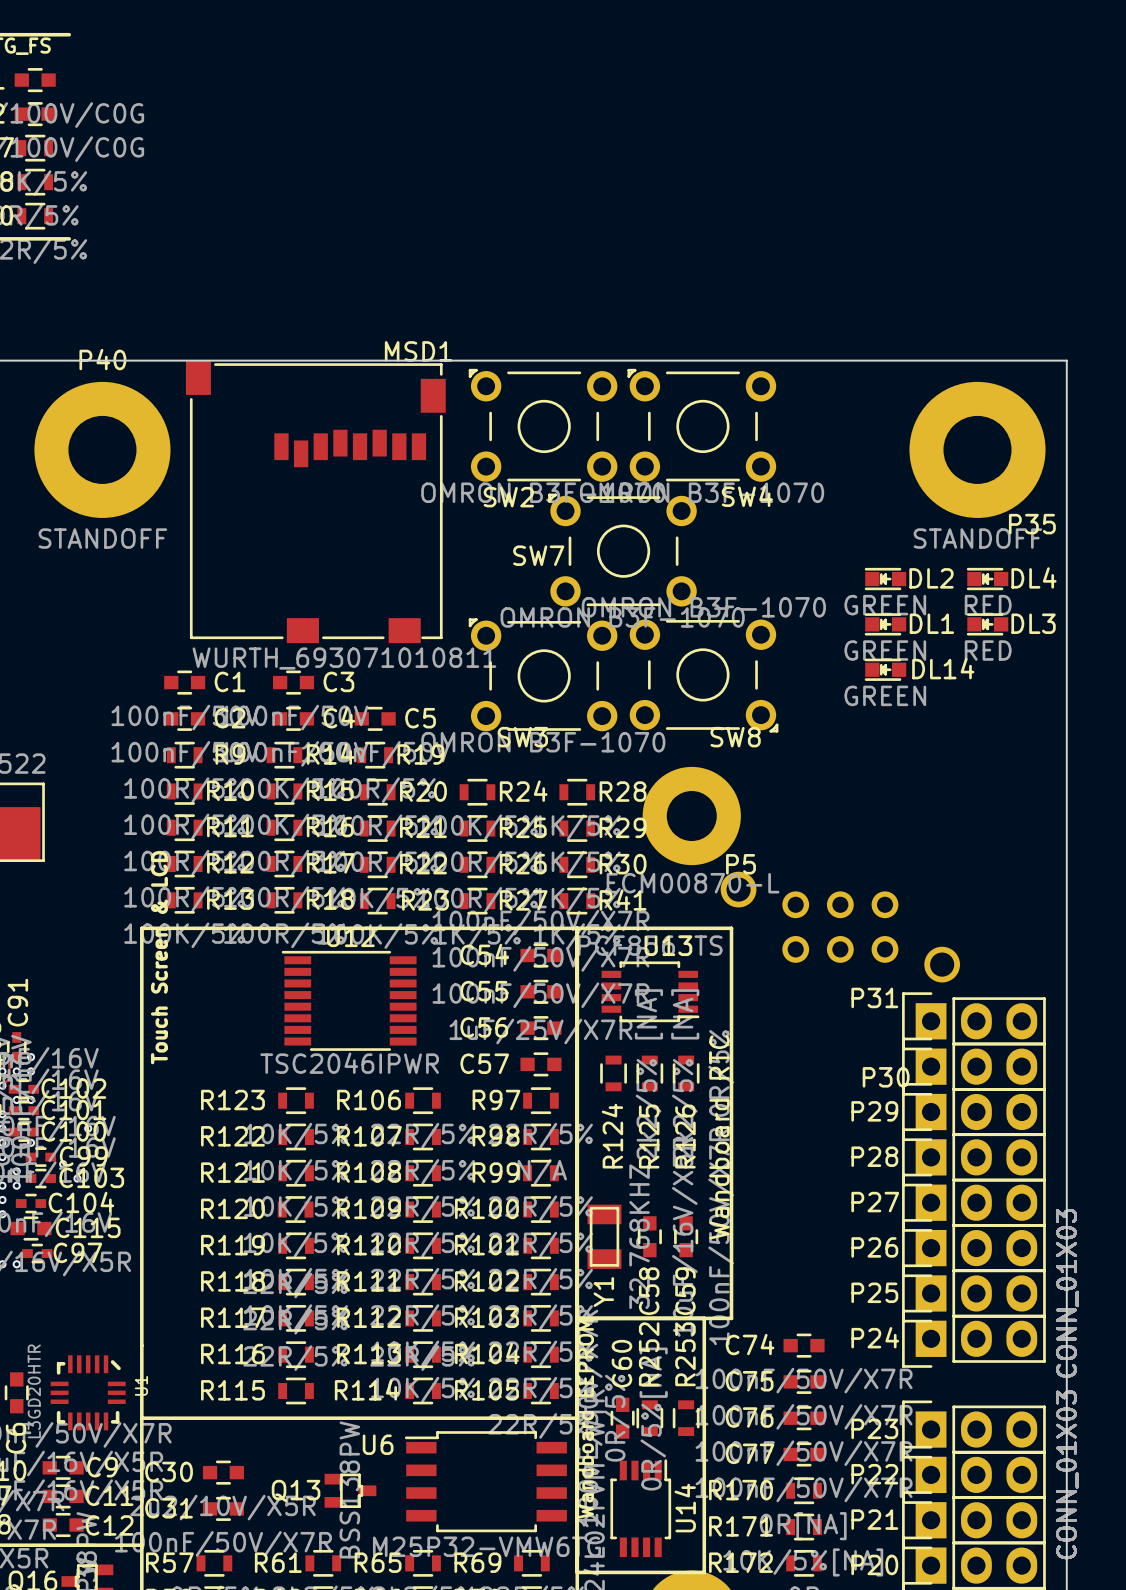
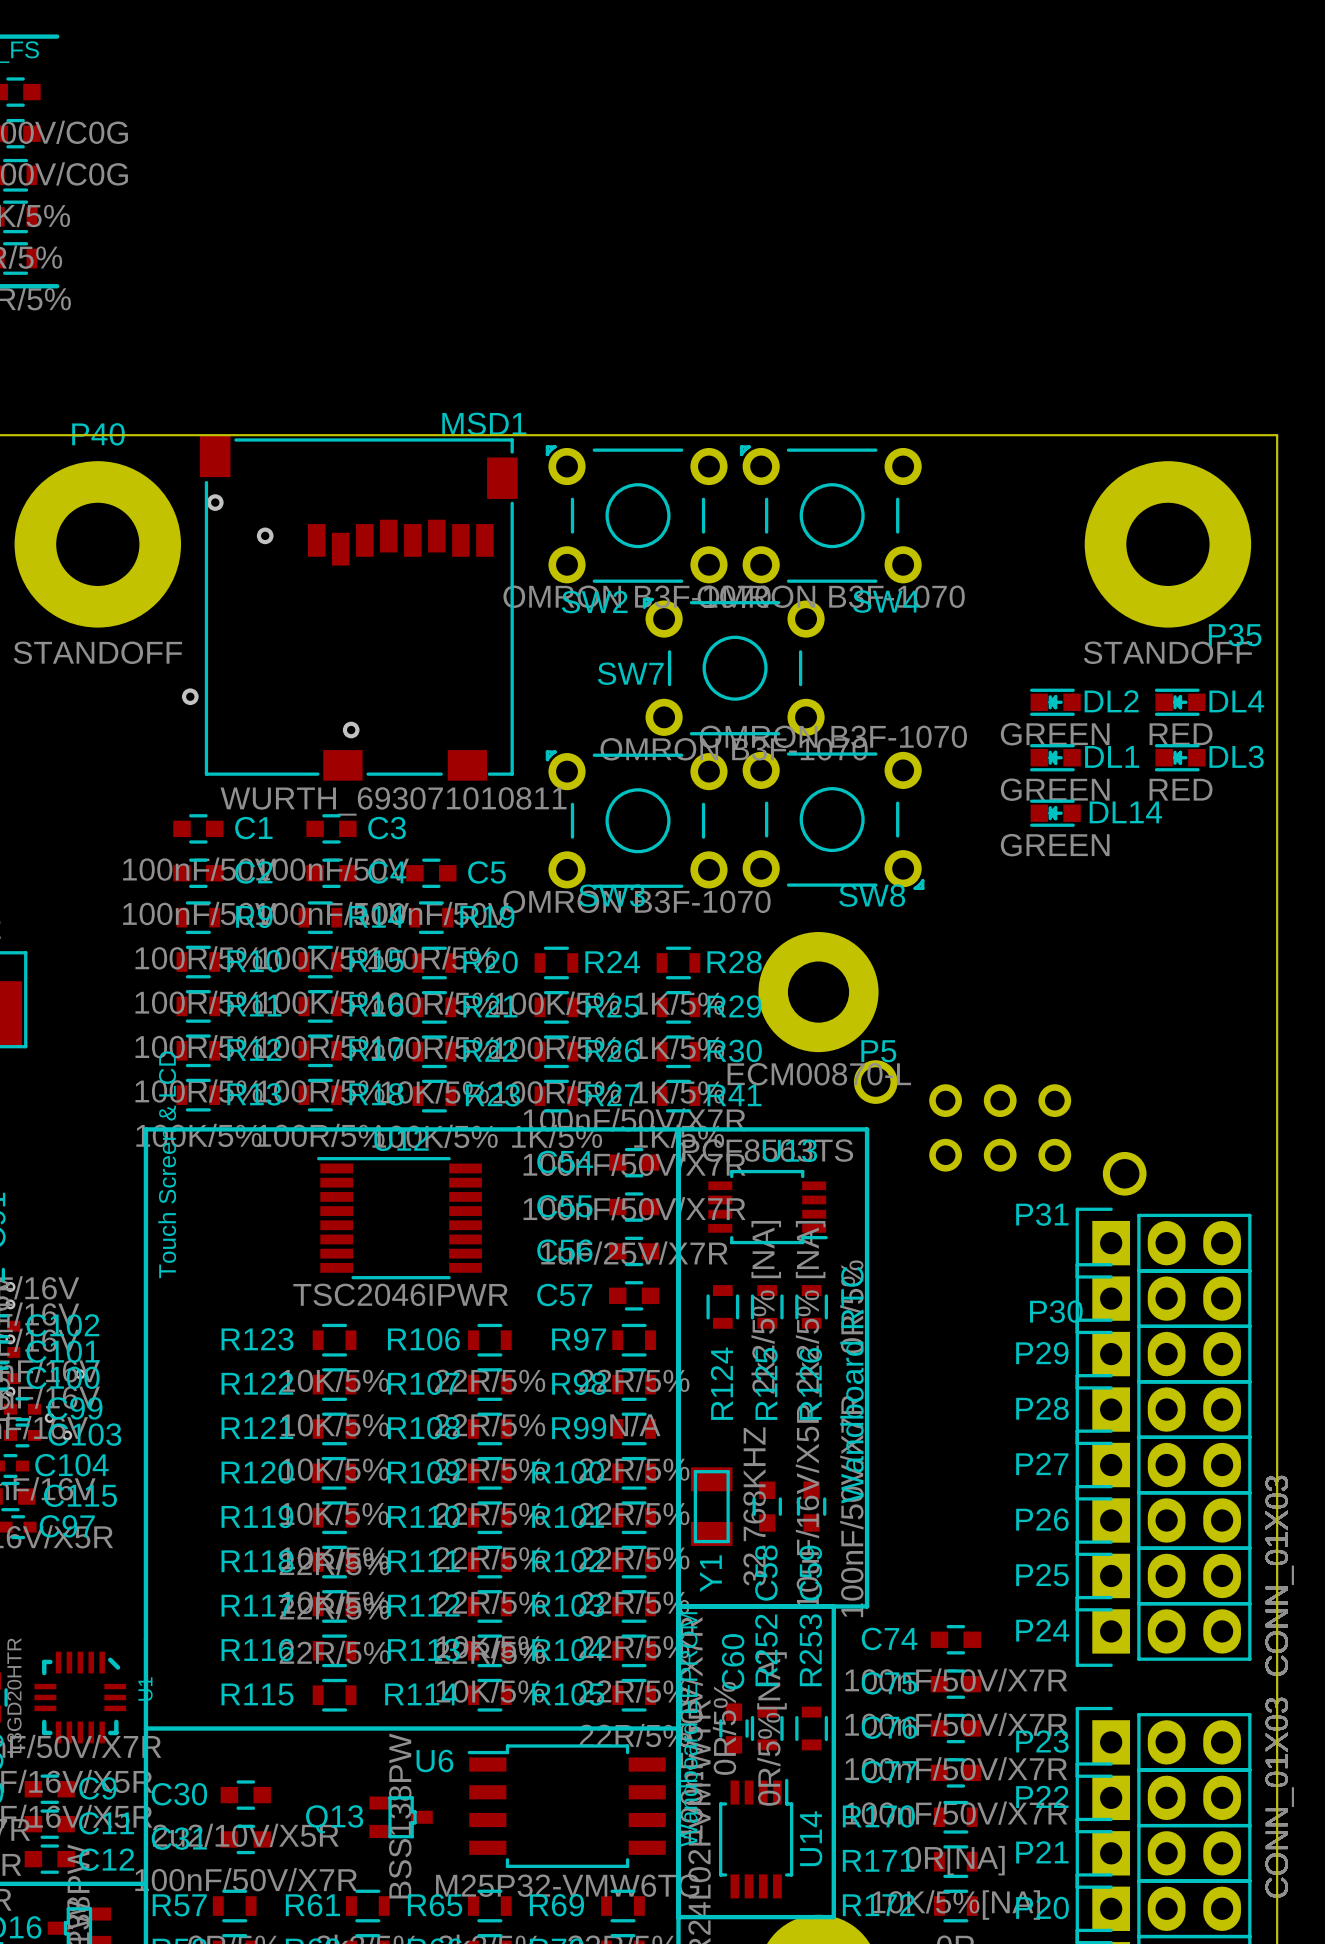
via: none -> (215, 502)
via: none -> (265, 535)
via: none -> (190, 696)
via: none -> (351, 730)

